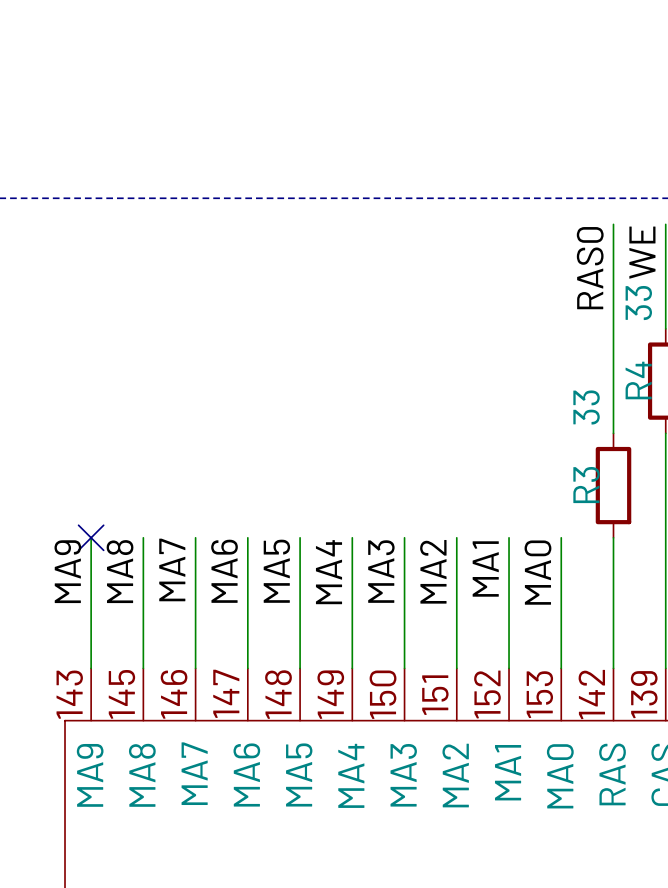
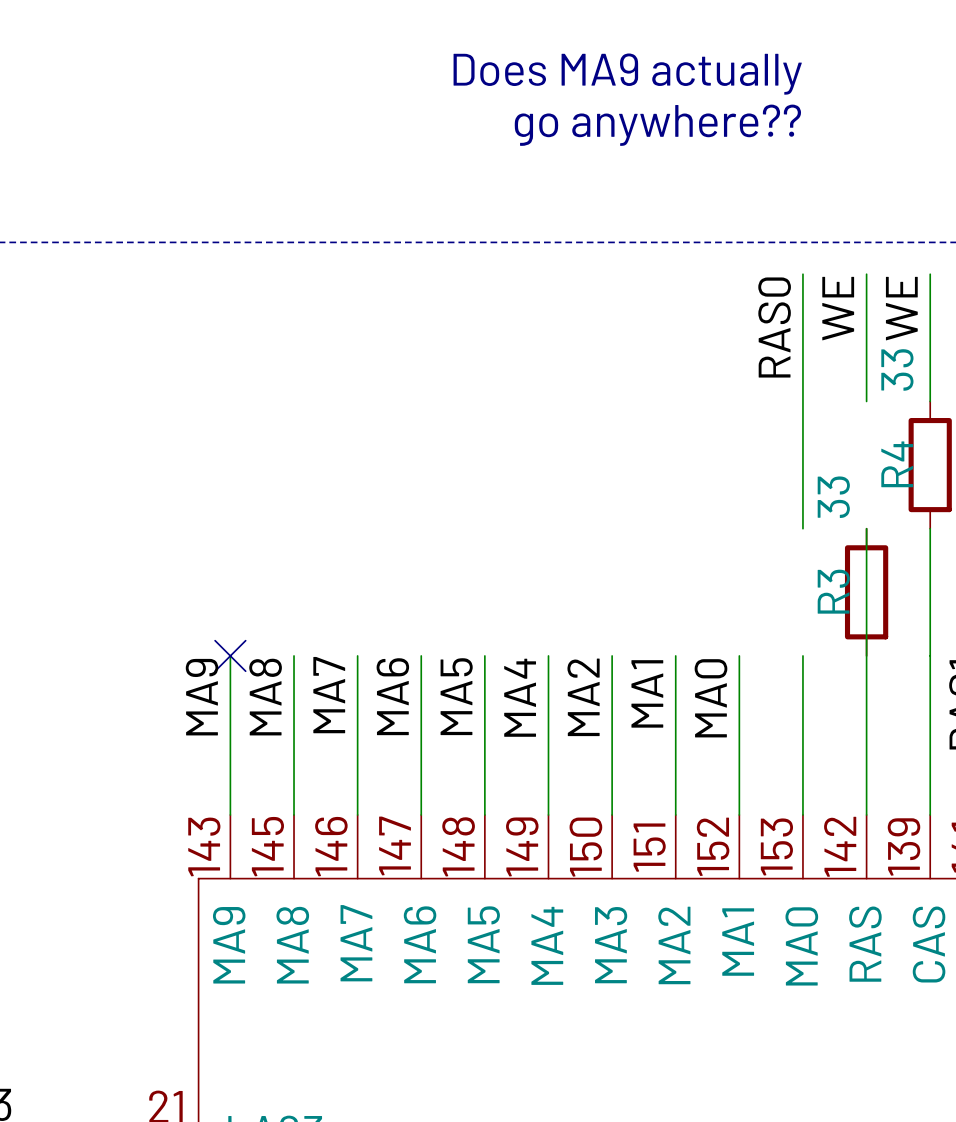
text: none -> Does MA9 actually (627, 74)
text: none -> go anywhere?? (657, 125)
wire: none -> (802, 274) (802, 528)
label: none -> RAS0 (774, 327)
label: RAS0 (590, 268) -> WE (838, 308)
wire: (613, 328) (613, 433) -> (866, 655) (866, 528)
label: MA1 (485, 568) -> MA0 (710, 698)
label: MA3 (381, 571) -> MA2 (583, 697)
label: MA2 (433, 571) -> MA1 (647, 693)
label: MA0 (537, 572) -> none

